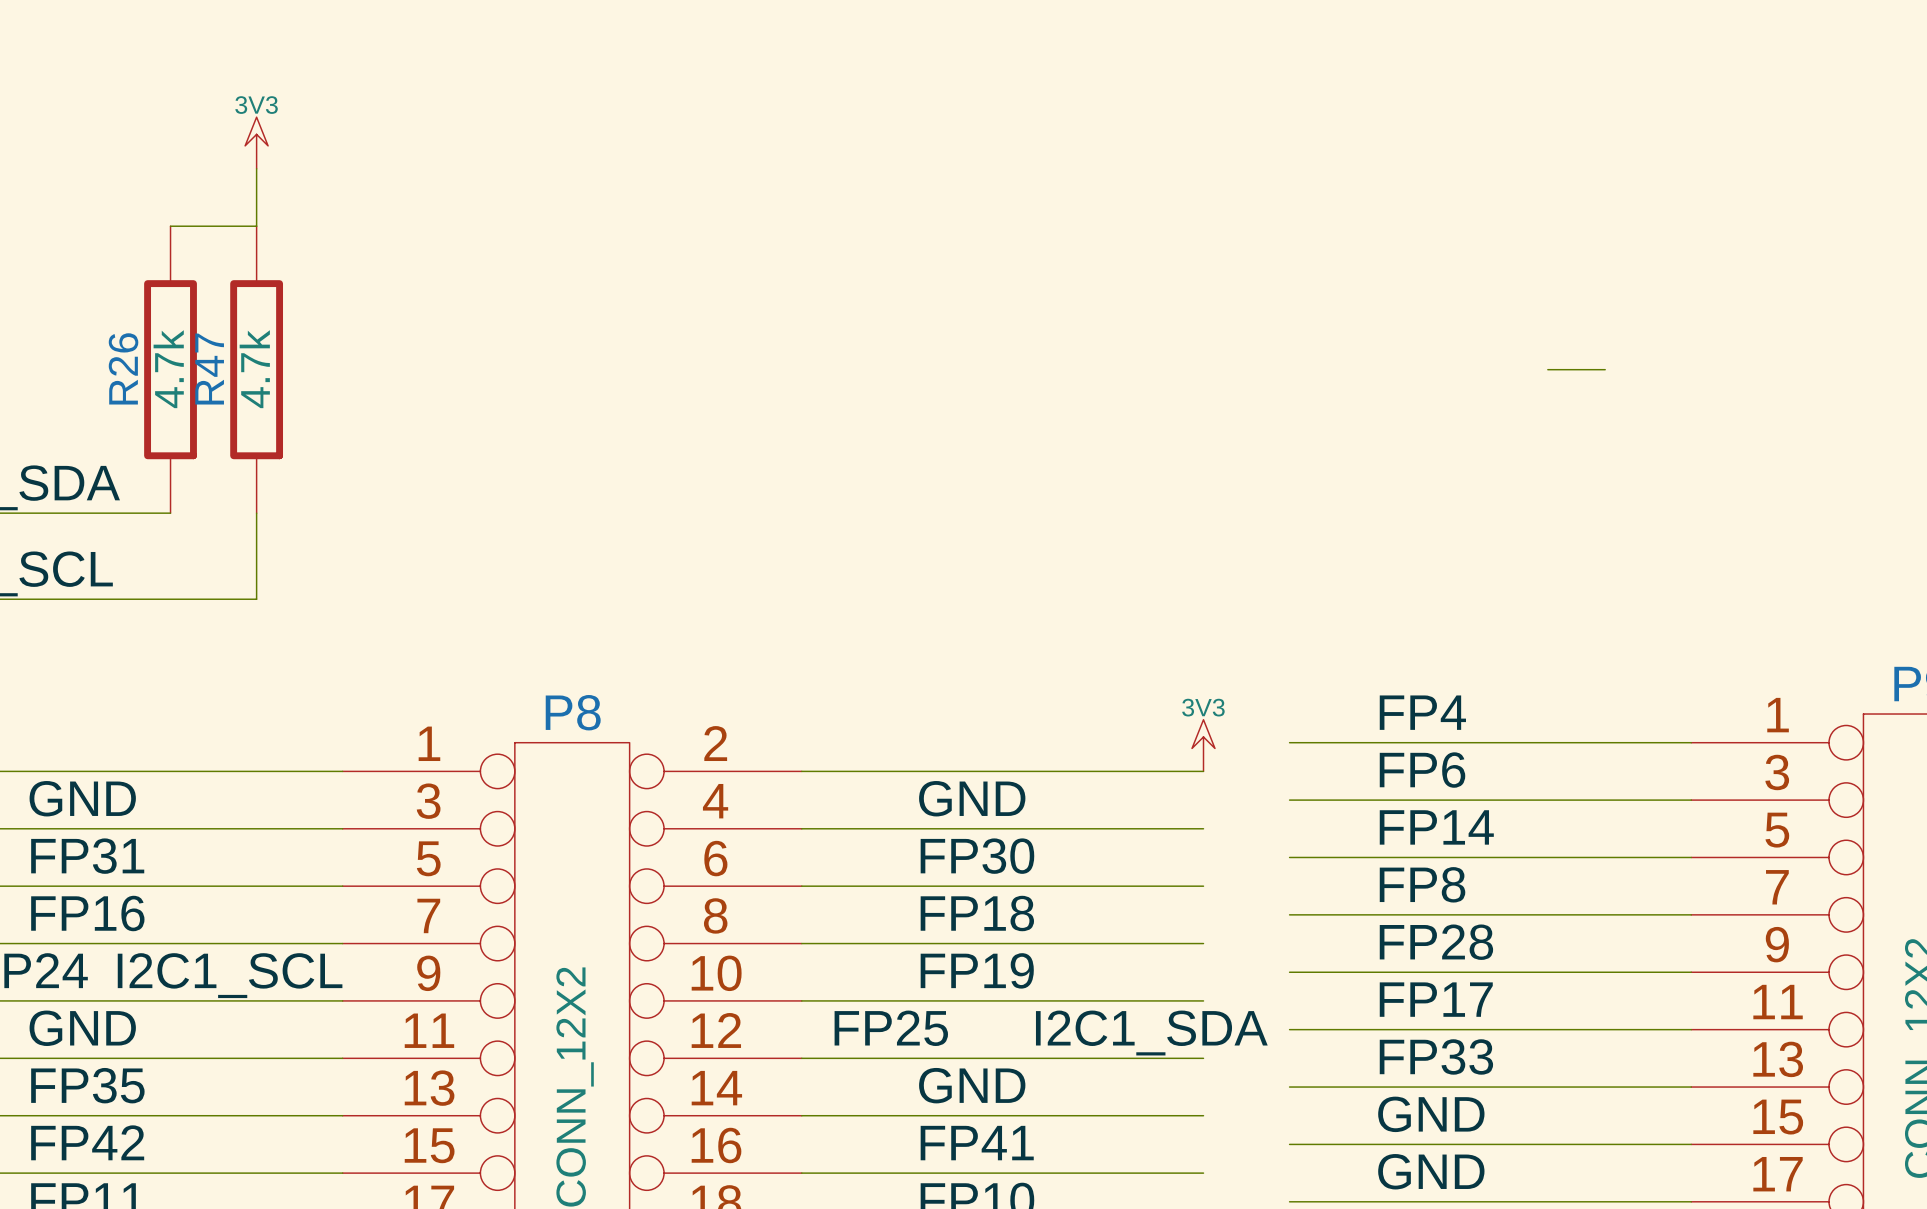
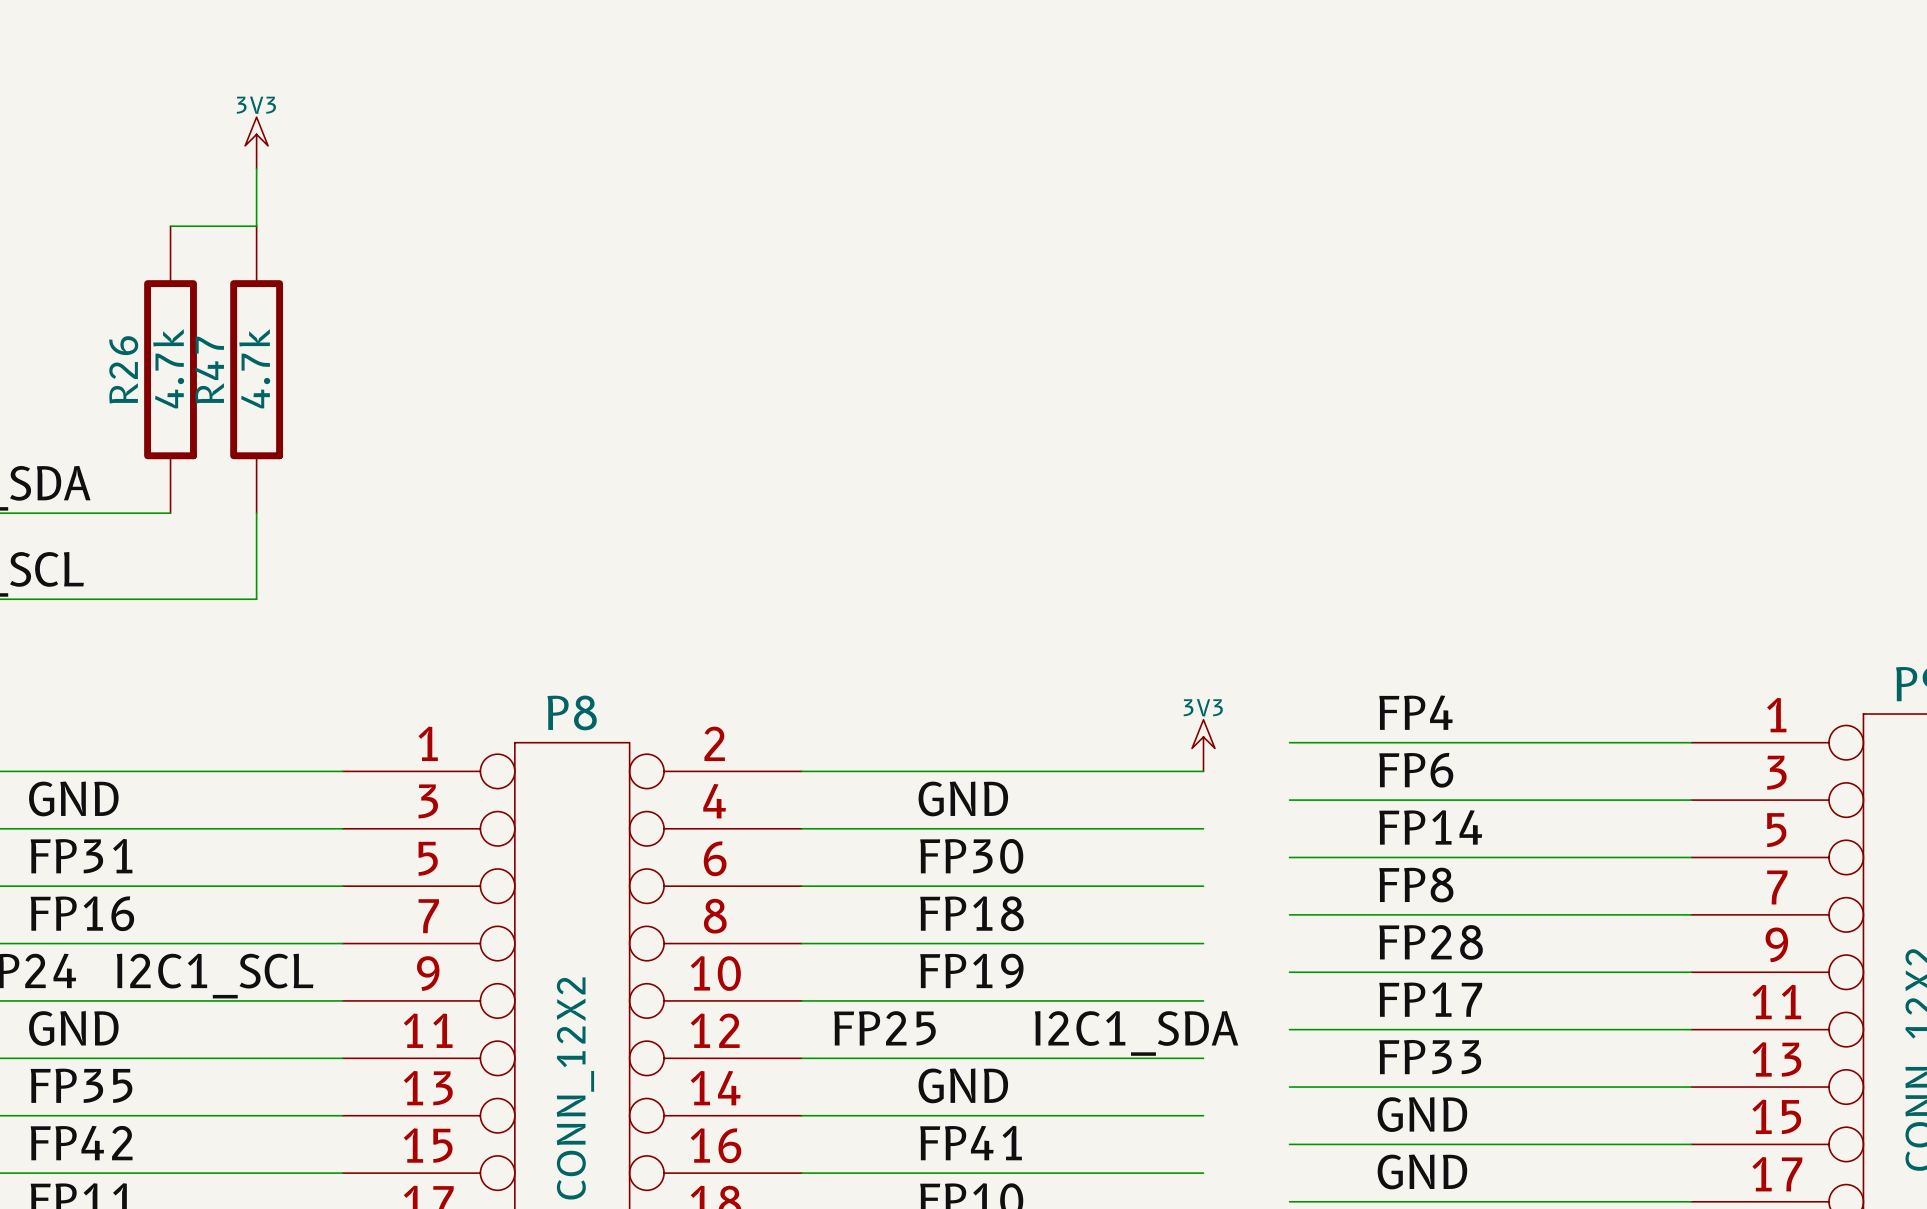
wire: (1547, 369) (1605, 369) -> none

